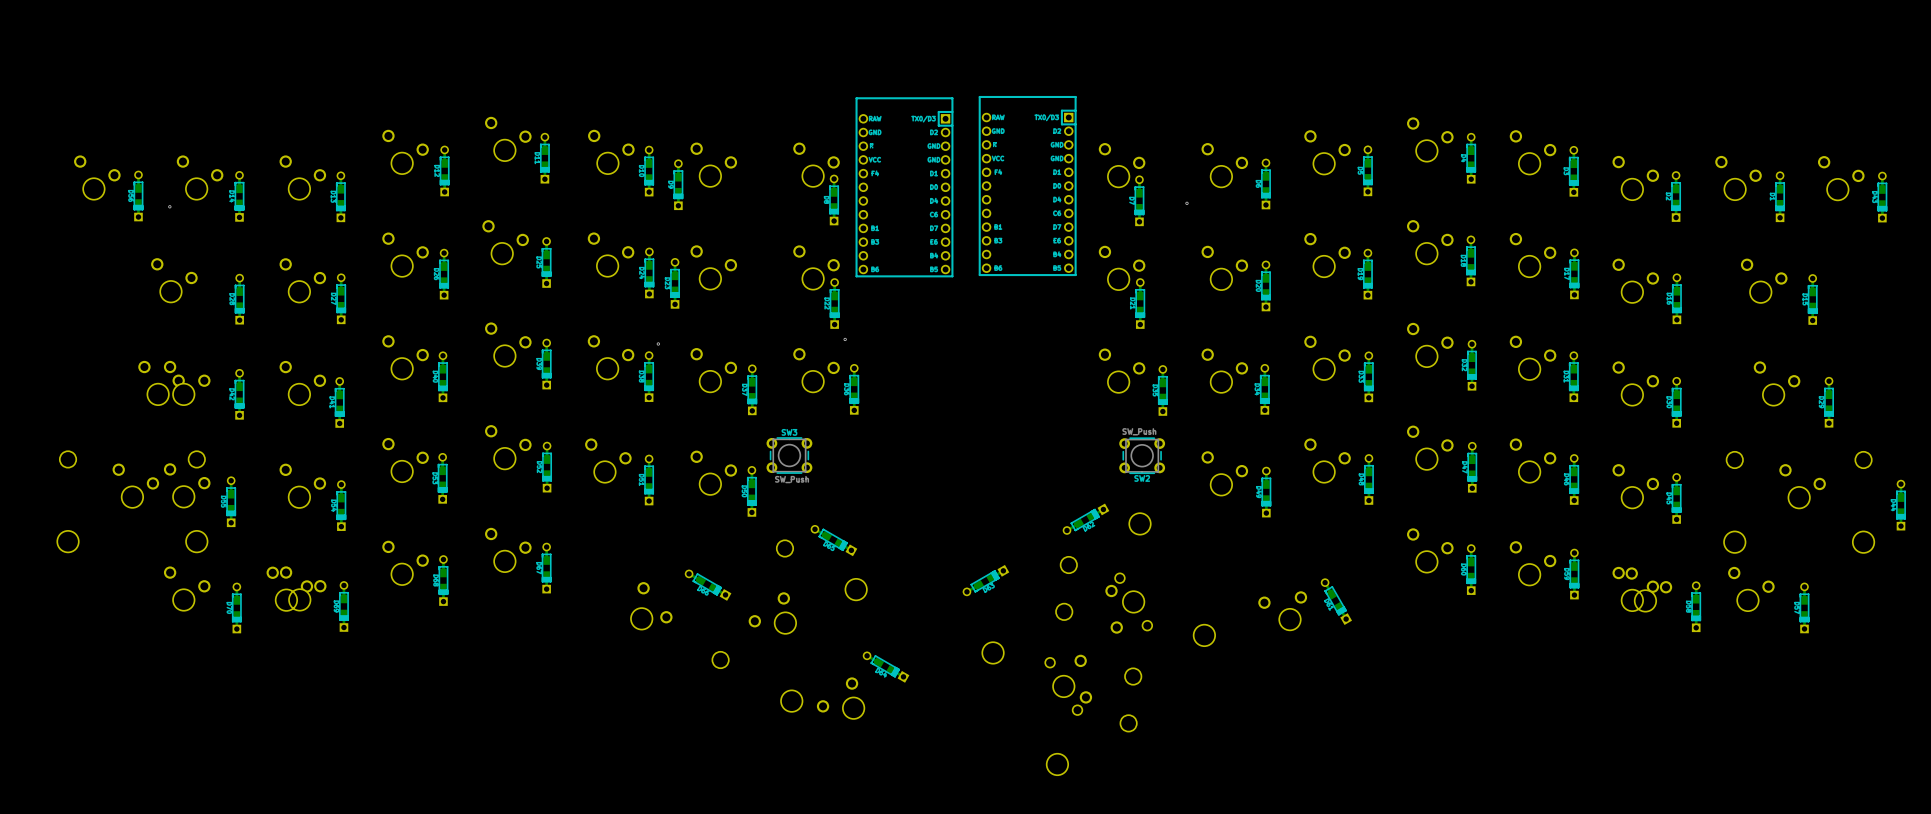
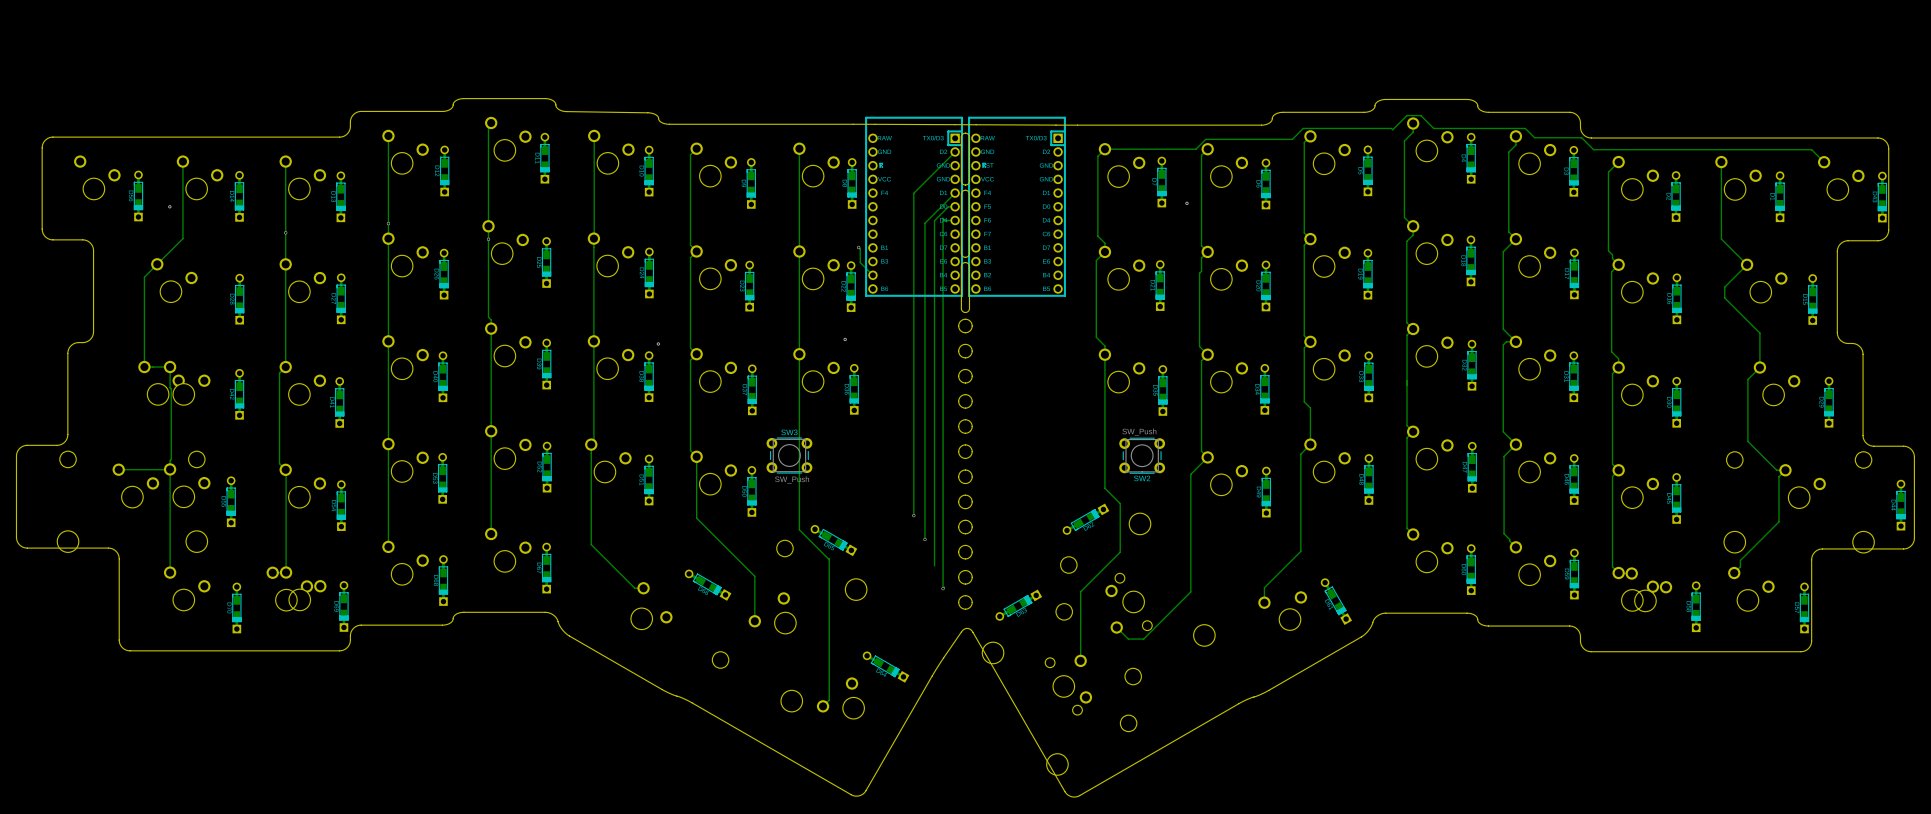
drawing: none -> [15, 98, 1915, 798]
track: none -> (491, 122) (488, 125) (491, 533)
track: none -> (1413, 123) (1413, 132) (1404, 140) (1404, 217) (1413, 226) (1413, 234) (1406, 241) (1406, 322) (1413, 329) (1407, 335) (1407, 425) (1413, 431) (1407, 437) (1407, 528) (1413, 534)
track: none -> (388, 135) (388, 546)
track: none -> (594, 135) (593, 441) (591, 444) (591, 544) (634, 588) (643, 588)
track: none -> (1310, 136) (1304, 142) (1304, 232) (1310, 239) (1304, 245) (1304, 335) (1310, 341) (1304, 348) (1304, 401) (1310, 408) (1310, 444) (1300, 454) (1300, 551) (1264, 587) (1264, 602)
track: none -> (1515, 136) (1515, 145) (1508, 152) (1508, 231) (1515, 239) (1503, 251) (1503, 329) (1515, 341) (1506, 341) (1503, 344) (1503, 431) (1509, 438)
track: none -> (696, 148) (690, 154) (690, 245) (696, 251) (690, 257) (690, 348) (696, 354) (690, 360) (690, 450) (696, 456) (696, 518) (754, 576) (754, 621)
track: none -> (799, 148) (799, 529) (829, 559)
track: none -> (1207, 149) (1201, 155) (1201, 245) (1207, 251) (1201, 258) (1201, 271) (1199, 273) (1199, 346) (1207, 354) (1201, 360) (1201, 451) (1207, 457) (1190, 474) (1190, 591) (1143, 639) (1128, 639) (1116, 627)
track: none -> (955, 151) (913, 193) (913, 515)
track: none -> (182, 161) (182, 238) (144, 277) (144, 367) (170, 367) (170, 572)
track: none -> (285, 161) (285, 367) (279, 373) (279, 463) (286, 470) (286, 572) (272, 572)
track: none -> (1618, 162) (1608, 172) (1608, 250) (1618, 264) (1611, 271) (1611, 351) (1618, 358) (1618, 367) (1612, 373) (1612, 464) (1618, 470) (1612, 476) (1612, 566) (1619, 573) (1631, 573)
track: none -> (1721, 162) (1721, 239) (1747, 264) (1724, 287) (1724, 297) (1759, 333) (1759, 367) (1747, 379) (1747, 441) (1776, 470) (1785, 470) (1779, 476) (1779, 521) (1740, 560) (1740, 566) (1734, 573)
track: none -> (1824, 162) (1811, 149) (1593, 149) (1581, 137) (1534, 137) (1525, 128) (1433, 128) (1420, 115) (1406, 115) (1392, 129) (1303, 128) (1292, 139) (1205, 139) (1195, 149) (1104, 149) (1097, 156) (1097, 236) (1104, 243) (1104, 251) (1096, 260) (1096, 337) (1104, 345) (1104, 488) (1120, 503) (1120, 552) (1080, 591) (1080, 660)
part position: (678, 184) -> (751, 183)
part: (1027, 186) -> none
part position: (904, 187) -> (914, 206)
track: none -> (955, 193) (924, 223) (924, 539)
part position: (834, 199) -> (852, 183)
part position: (1139, 200) -> (1161, 182)
track: none -> (955, 206) (948, 206) (934, 220) (934, 565)
part: none -> (1016, 206)
track: none -> (955, 220) (945, 220) (943, 218) (943, 588) (944, 587)
via: none -> (388, 223)
via: none -> (285, 232)
via: none -> (488, 239)
track: none -> (858, 247) (860, 262) (872, 275)
via: none -> (858, 247)
part position: (675, 283) -> (749, 286)
part position: (834, 303) -> (851, 286)
part position: (1140, 303) -> (1160, 285)
track: none -> (1509, 438) (1515, 444) (1504, 456) (1504, 533) (1515, 547)
track: none -> (170, 469) (118, 469)
via: none -> (913, 515)
via: none -> (924, 539)
track: none -> (829, 558) (829, 700) (823, 706)
part position: (985, 580) -> (1018, 605)
via: none -> (943, 588)

